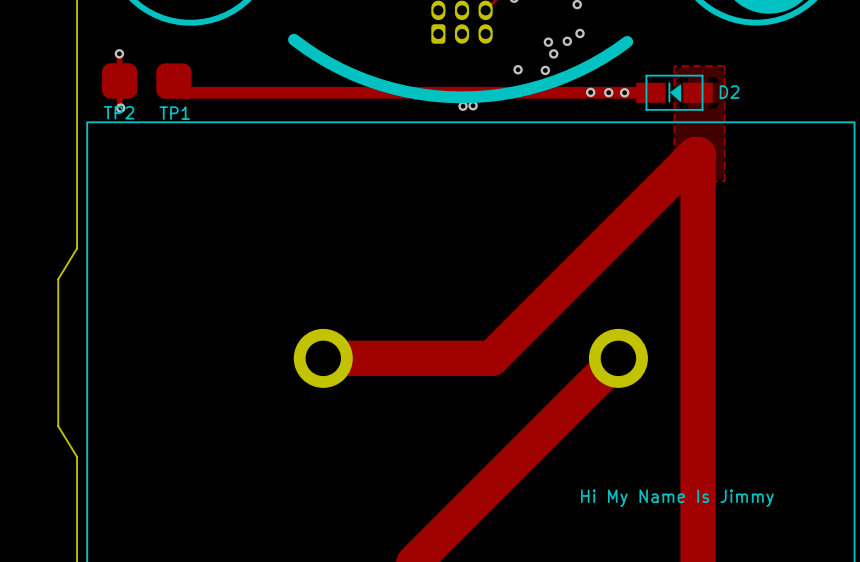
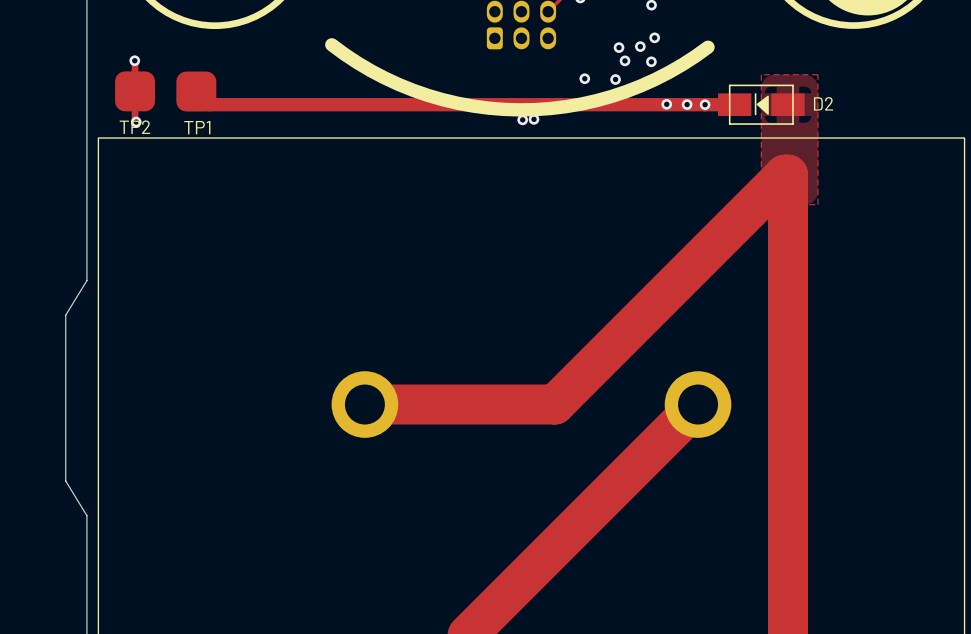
via: none -> (651, 61)
text: Hi My Name Is Jimmy (677, 498) -> none

